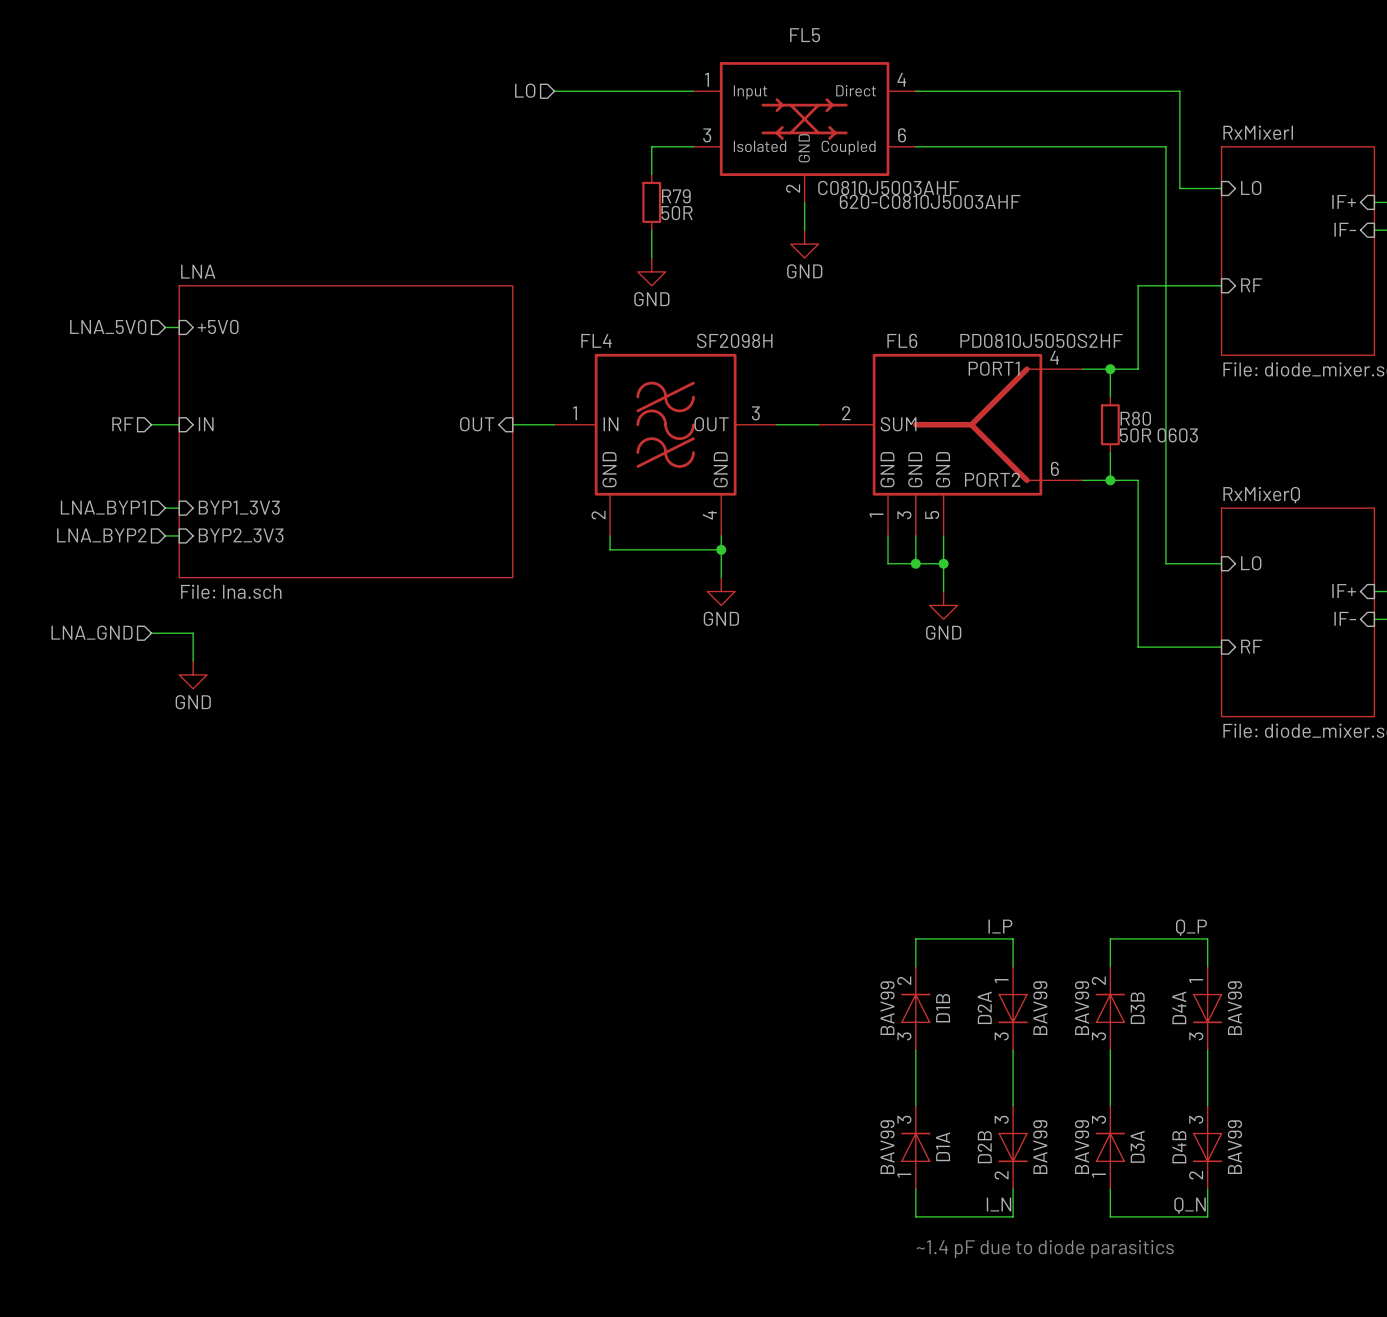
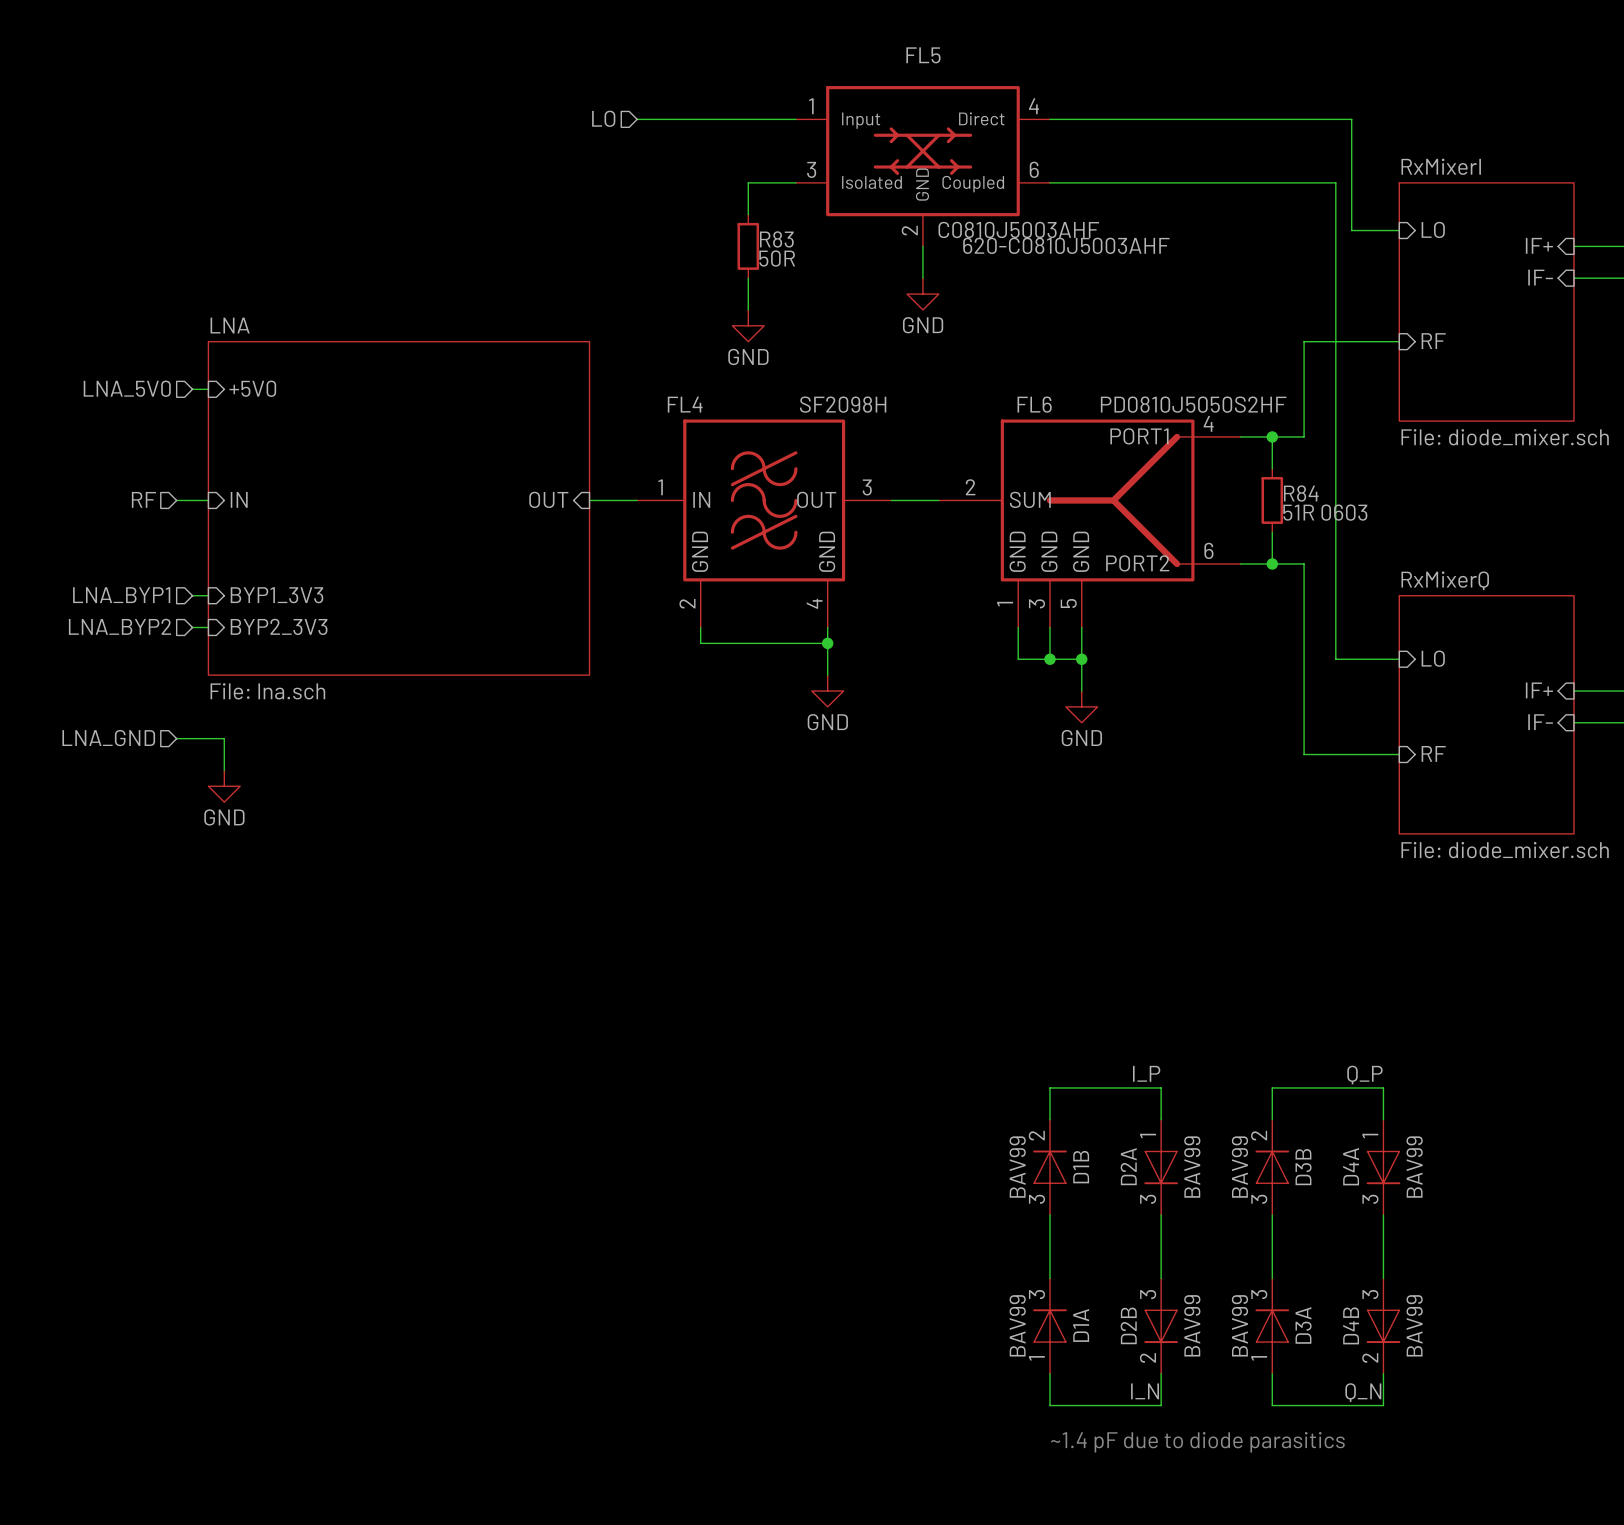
R79 name: R79 (676, 196) -> R83 (776, 239)
R80 name: R80 (1135, 418) -> R84 (1301, 493)
R80 value: 50R 0603 (1158, 435) -> 51R 0603 (1325, 512)

